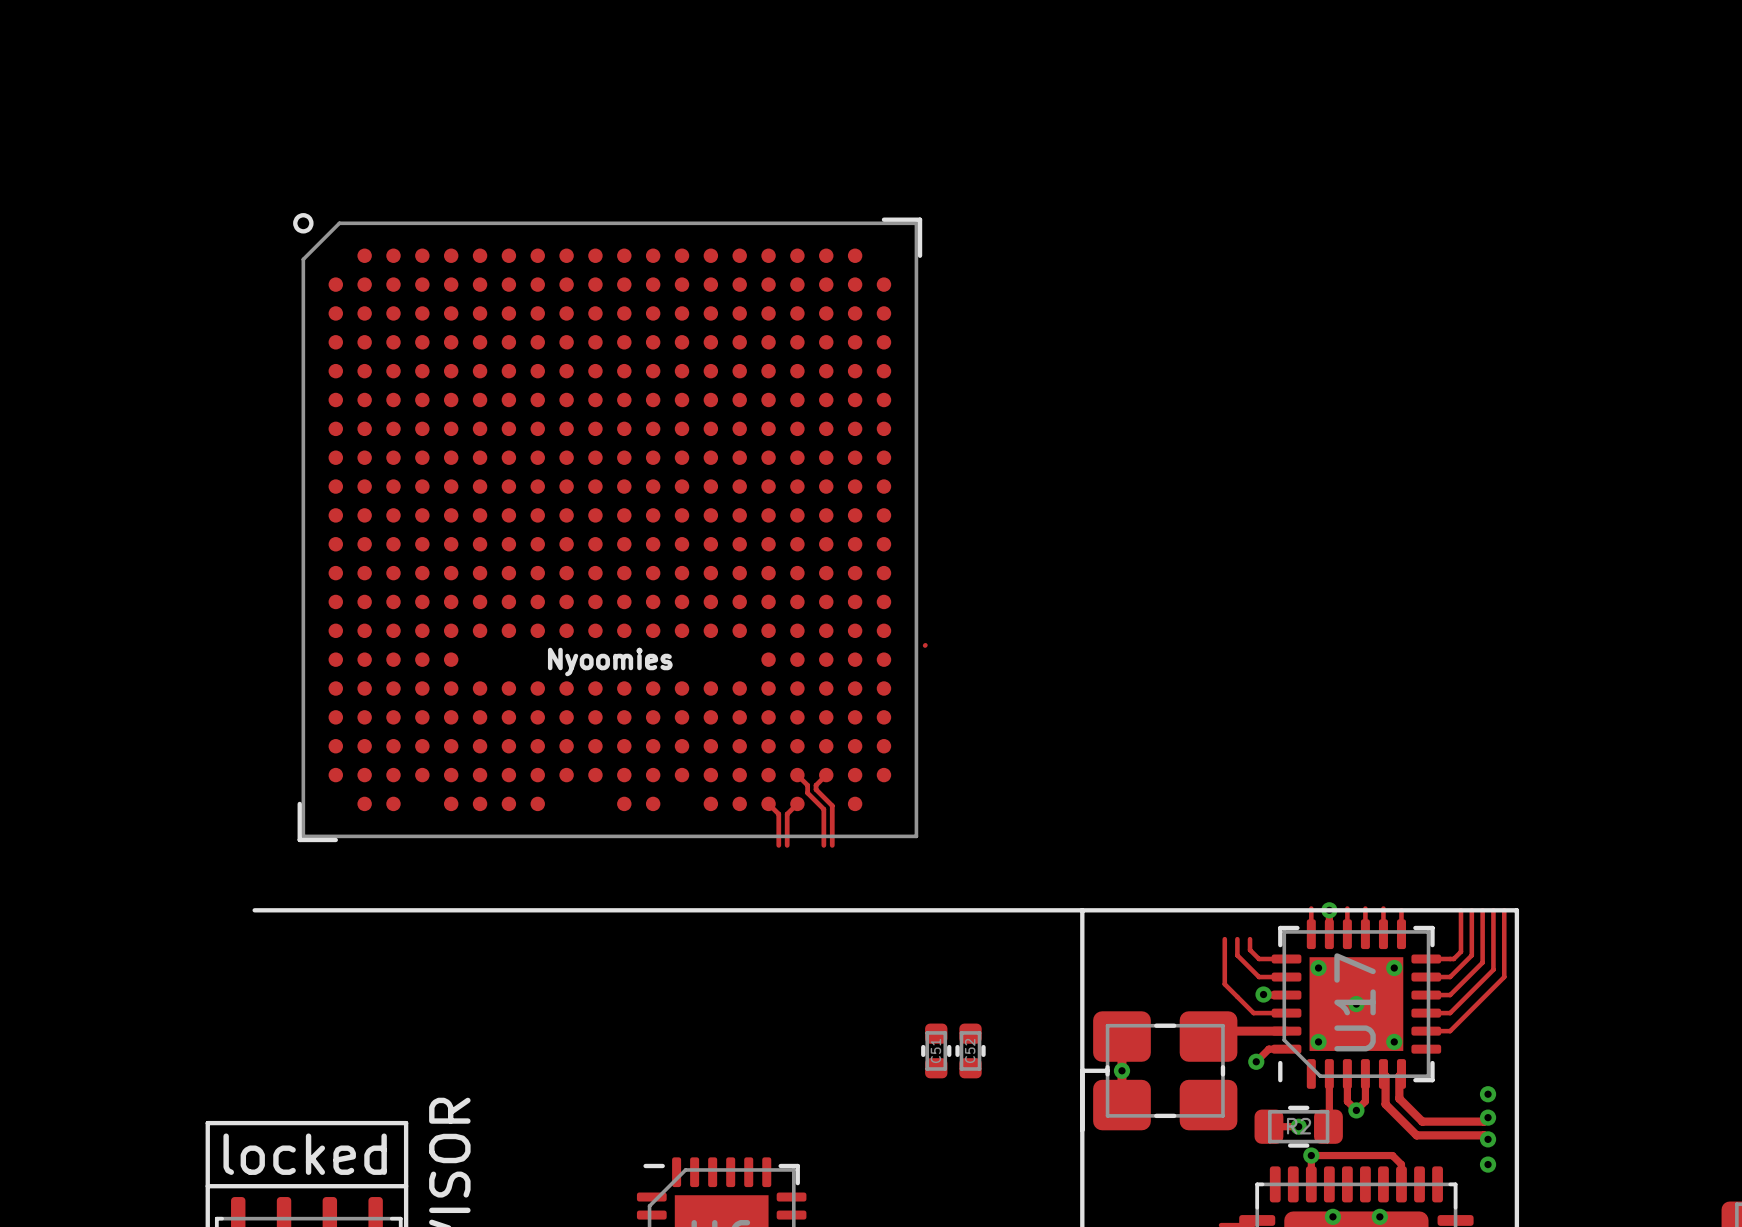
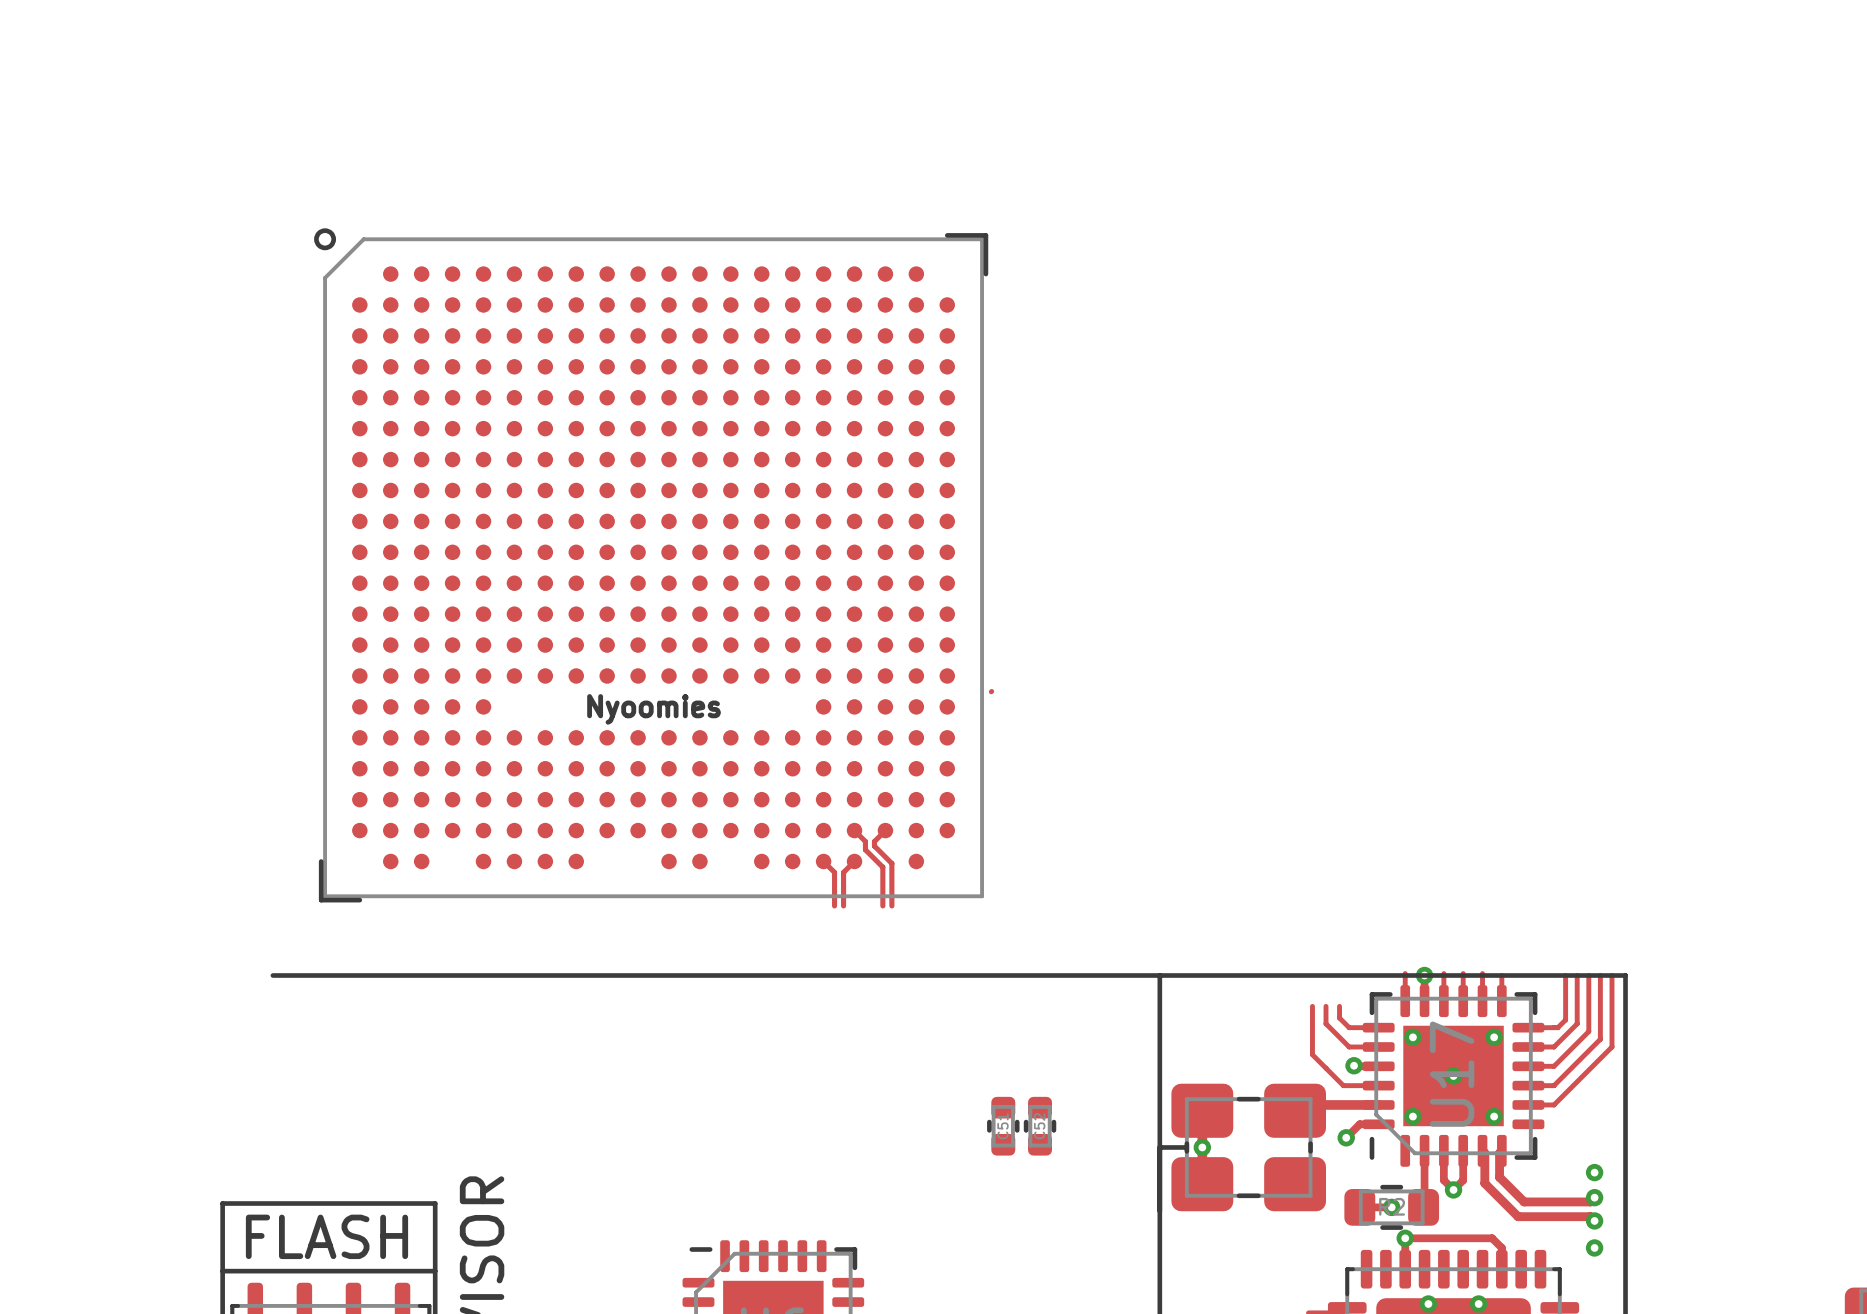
text: locked (305, 1154) -> FLASH (326, 1236)

